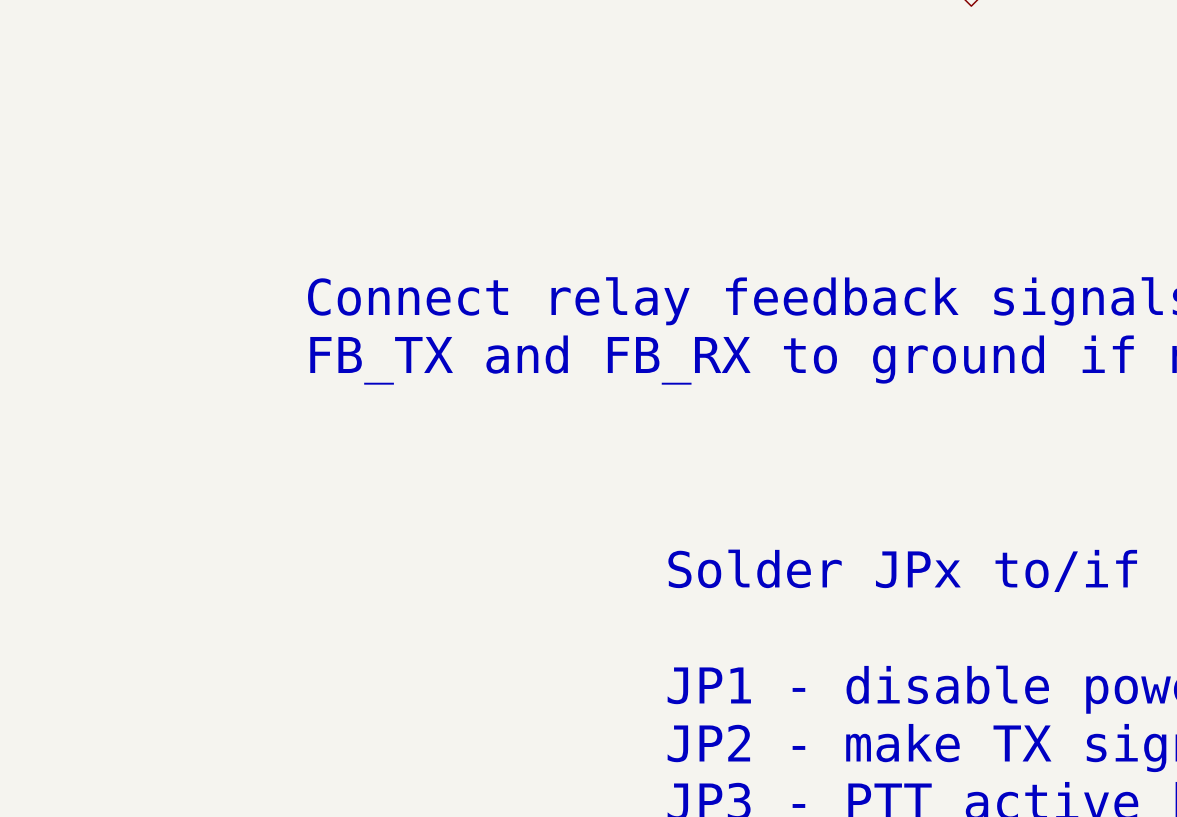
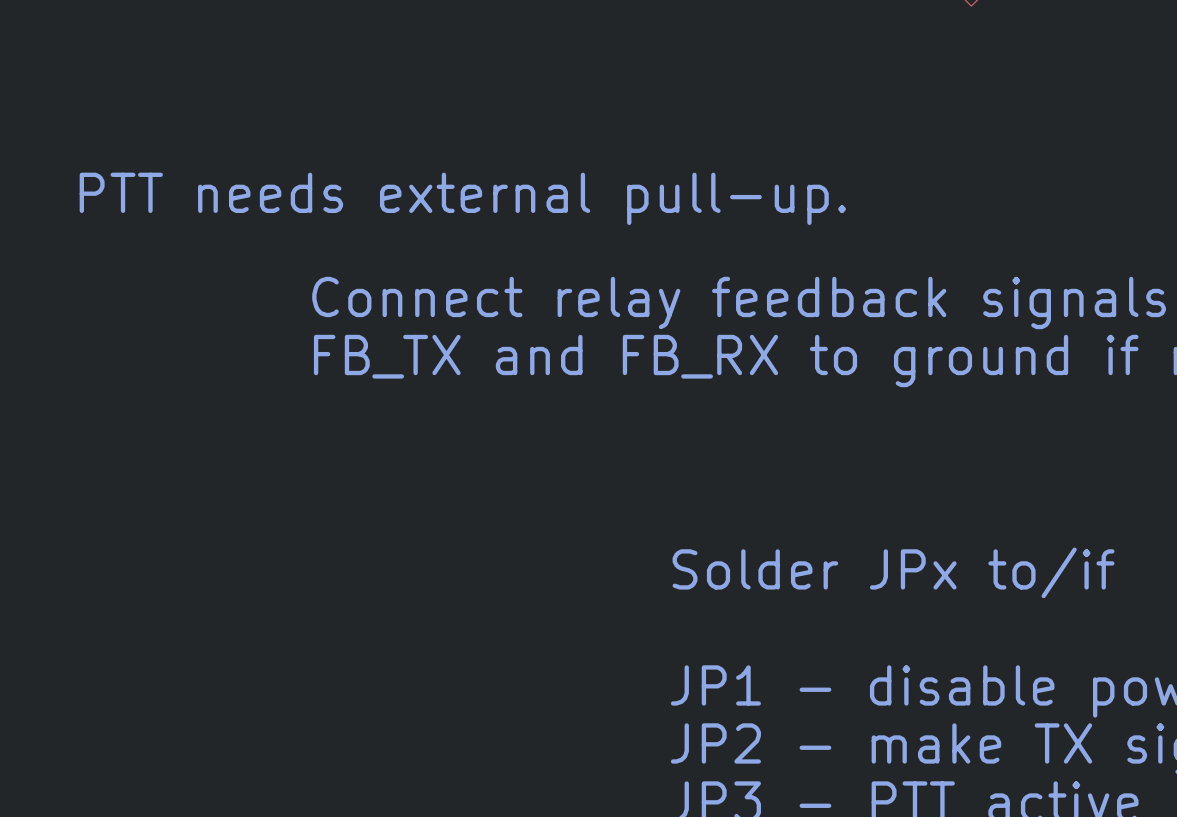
text: none -> PTT needs external pull-up. (462, 198)

